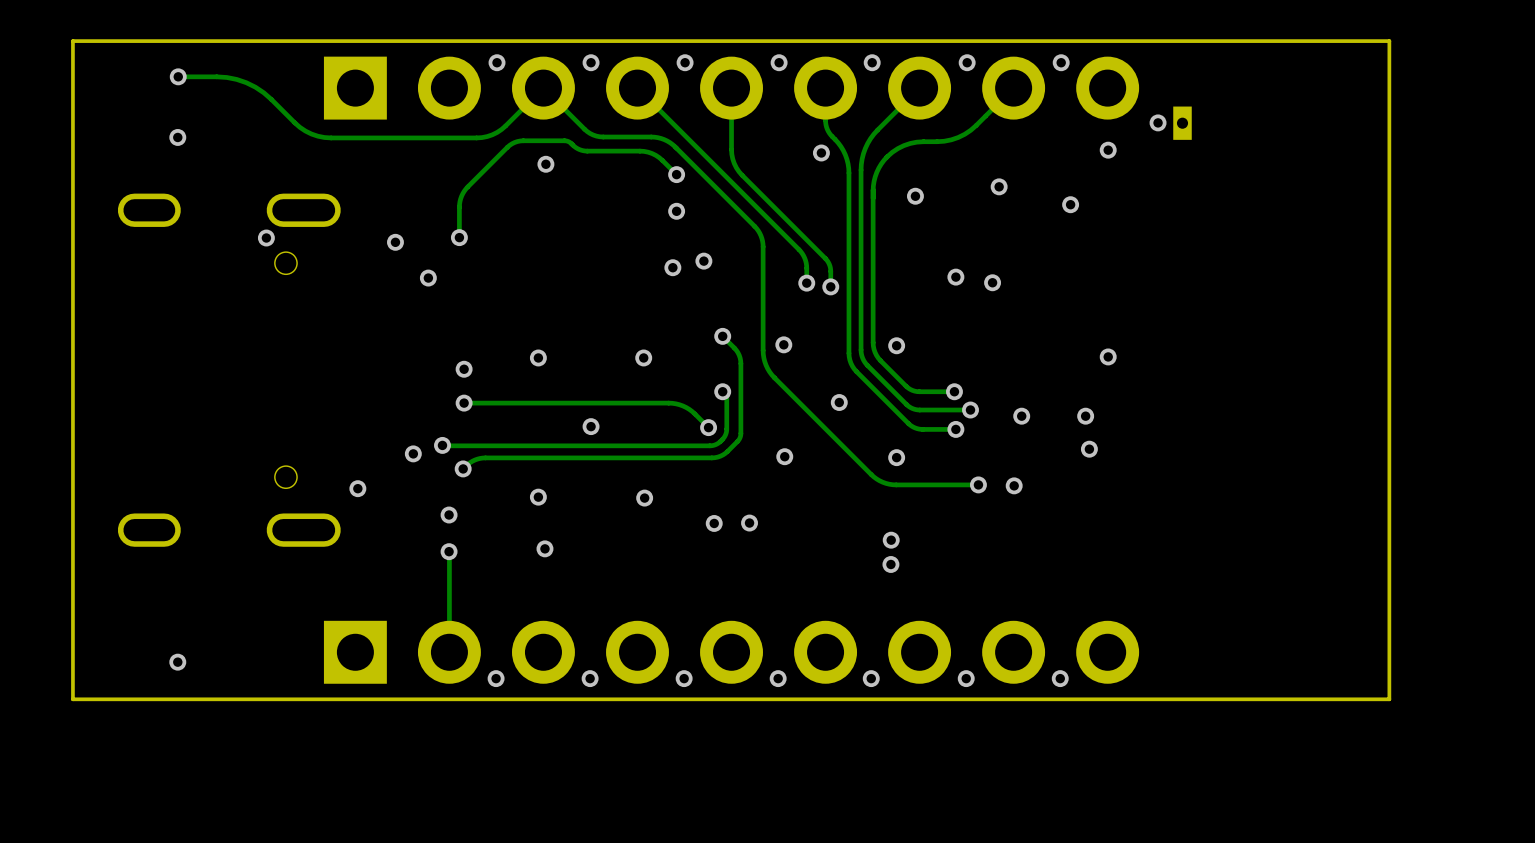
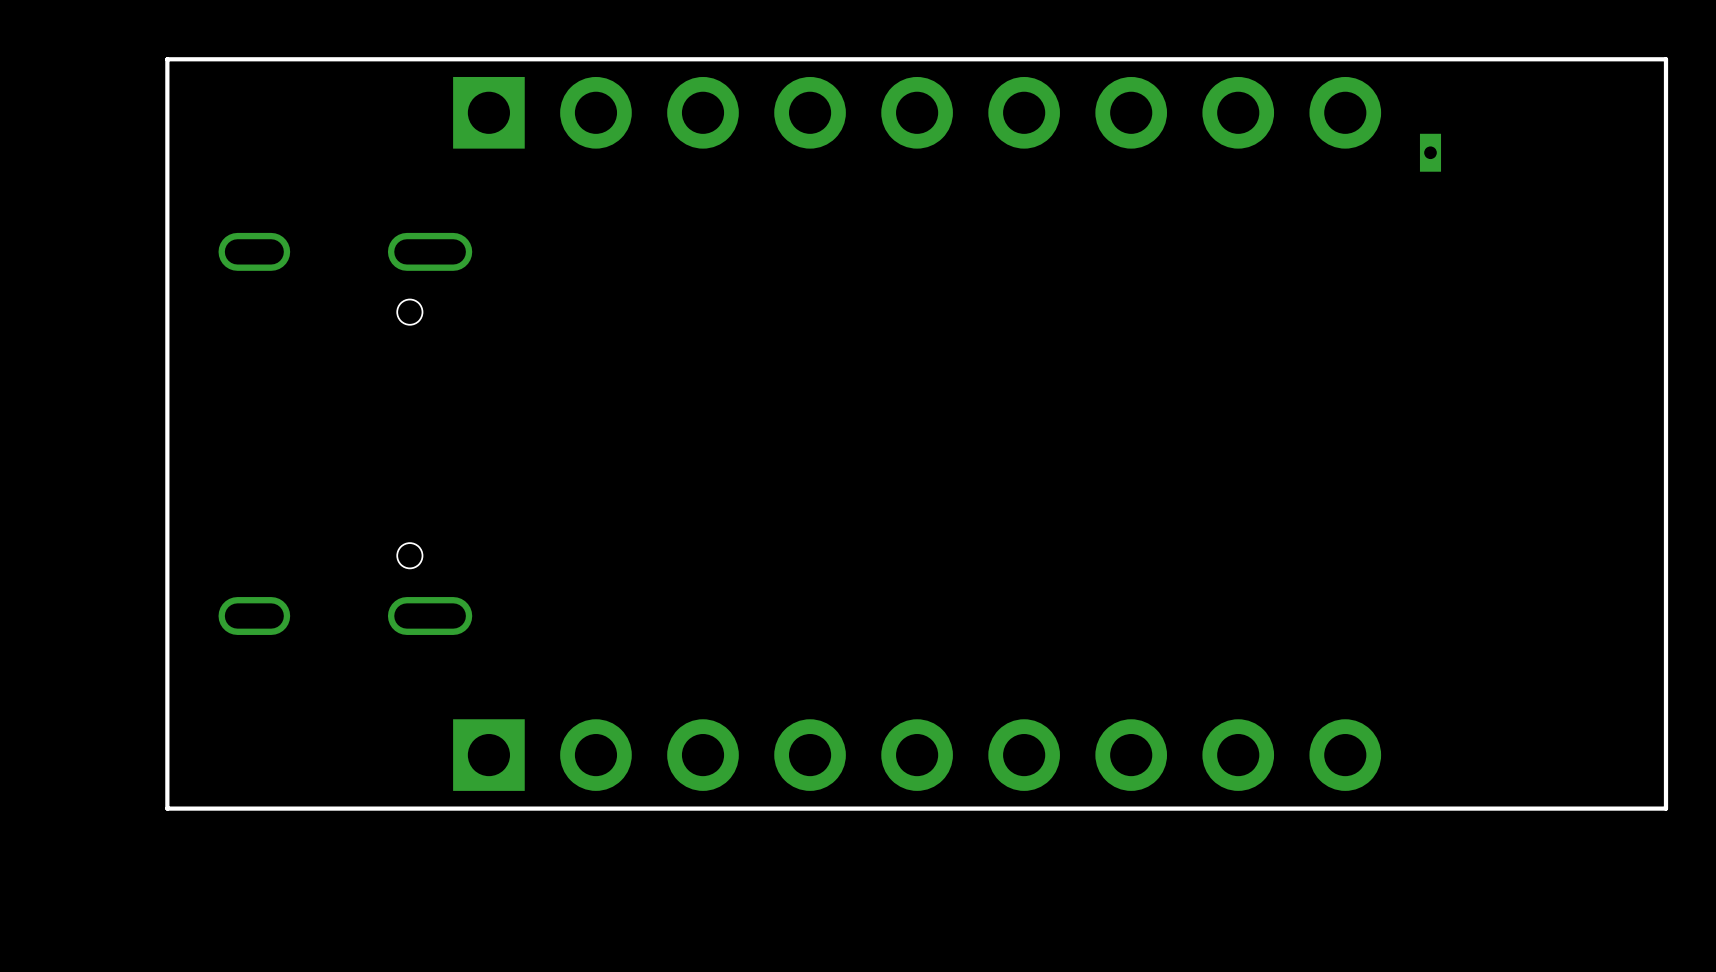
via: (497, 62) -> none
via: (591, 62) -> none
via: (685, 62) -> none
via: (779, 62) -> none
via: (872, 62) -> none
via: (967, 62) -> none
via: (1061, 62) -> none
track: (178, 76) (226, 77) (246, 82) (263, 92) (299, 127) (311, 134) (324, 137) (487, 136) (501, 129) (543, 88) (584, 129) (593, 135) (603, 137) (654, 137) (667, 141) (754, 226) (760, 235) (763, 246) (763, 354) (766, 365) (771, 374) (879, 480) (896, 484) (978, 484) -> none
via: (178, 76) -> none
track: (637, 88) (800, 251) (806, 263) (806, 283) -> none
track: (731, 88) (731, 149) (736, 167) (826, 259) (830, 267) (830, 286) -> none
track: (825, 88) (826, 127) (843, 150) (848, 168) (848, 353) (850, 363) (856, 371) (911, 425) (920, 429) (955, 429) -> none
track: (919, 88) (873, 134) (865, 148) (862, 159) (861, 354) (867, 365) (910, 407) (919, 410) (970, 410) -> none
track: (1013, 88) (964, 134) (944, 141) (910, 143) (897, 148) (887, 156) -> none
via: (1158, 122) -> none
via: (177, 137) -> none
via: (1108, 150) -> none
via: (821, 152) -> none
track: (887, 156) (876, 172) (873, 190) -> none
via: (545, 164) -> none
track: (676, 174) (659, 157) (648, 152) (585, 151) (565, 140) (517, 141) (507, 147) (464, 191) (459, 204) (459, 237) -> none
via: (676, 174) -> none
via: (999, 186) -> none
track: (873, 189) (873, 342) (875, 352) (880, 360) (909, 389) (919, 391) (954, 391) -> none
via: (915, 196) -> none
via: (1070, 204) -> none
via: (676, 211) -> none
via: (459, 237) -> none
via: (266, 238) -> none
via: (395, 242) -> none
via: (703, 261) -> none
via: (672, 267) -> none
via: (955, 277) -> none
via: (428, 278) -> none
via: (992, 282) -> none
via: (806, 283) -> none
via: (830, 286) -> none
track: (722, 336) (737, 352) (740, 363) (740, 435) (737, 441) (723, 454) (711, 457) (482, 458) (472, 461) (463, 468) -> none
via: (722, 336) -> none
via: (783, 344) -> none
via: (896, 345) -> none
via: (1108, 356) -> none
via: (538, 357) -> none
via: (643, 357) -> none
via: (464, 369) -> none
track: (722, 391) (726, 395) (726, 431) (720, 441) (712, 445) (442, 445) -> none
via: (722, 391) -> none
via: (954, 391) -> none
via: (839, 402) -> none
track: (464, 403) (672, 403) (689, 409) (708, 427) -> none
via: (464, 403) -> none
via: (970, 410) -> none
via: (1021, 416) -> none
via: (1085, 416) -> none
via: (591, 426) -> none
via: (708, 427) -> none
via: (955, 429) -> none
via: (442, 445) -> none
via: (1089, 449) -> none
via: (413, 453) -> none
via: (784, 456) -> none
via: (896, 457) -> none
via: (463, 468) -> none
via: (978, 484) -> none
via: (1014, 485) -> none
via: (357, 488) -> none
via: (538, 497) -> none
via: (644, 498) -> none
via: (449, 515) -> none
via: (714, 523) -> none
via: (749, 523) -> none
via: (891, 540) -> none
via: (544, 548) -> none
via: (449, 551) -> none
track: (449, 552) (449, 652) -> none
via: (890, 564) -> none
via: (177, 662) -> none
via: (496, 678) -> none
via: (590, 678) -> none
via: (684, 678) -> none
via: (778, 678) -> none
via: (871, 678) -> none
via: (966, 678) -> none
via: (1060, 678) -> none

